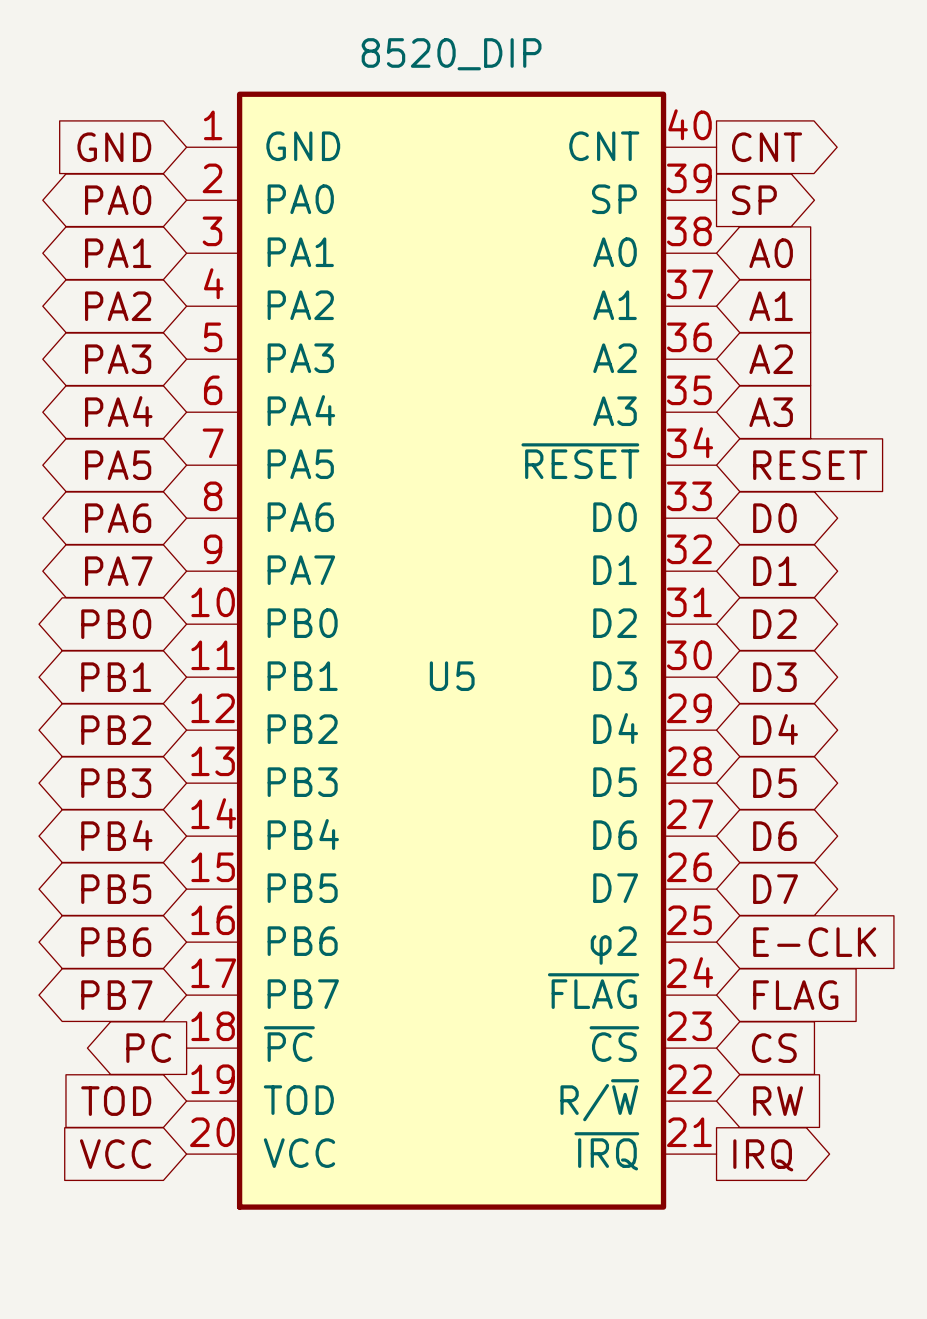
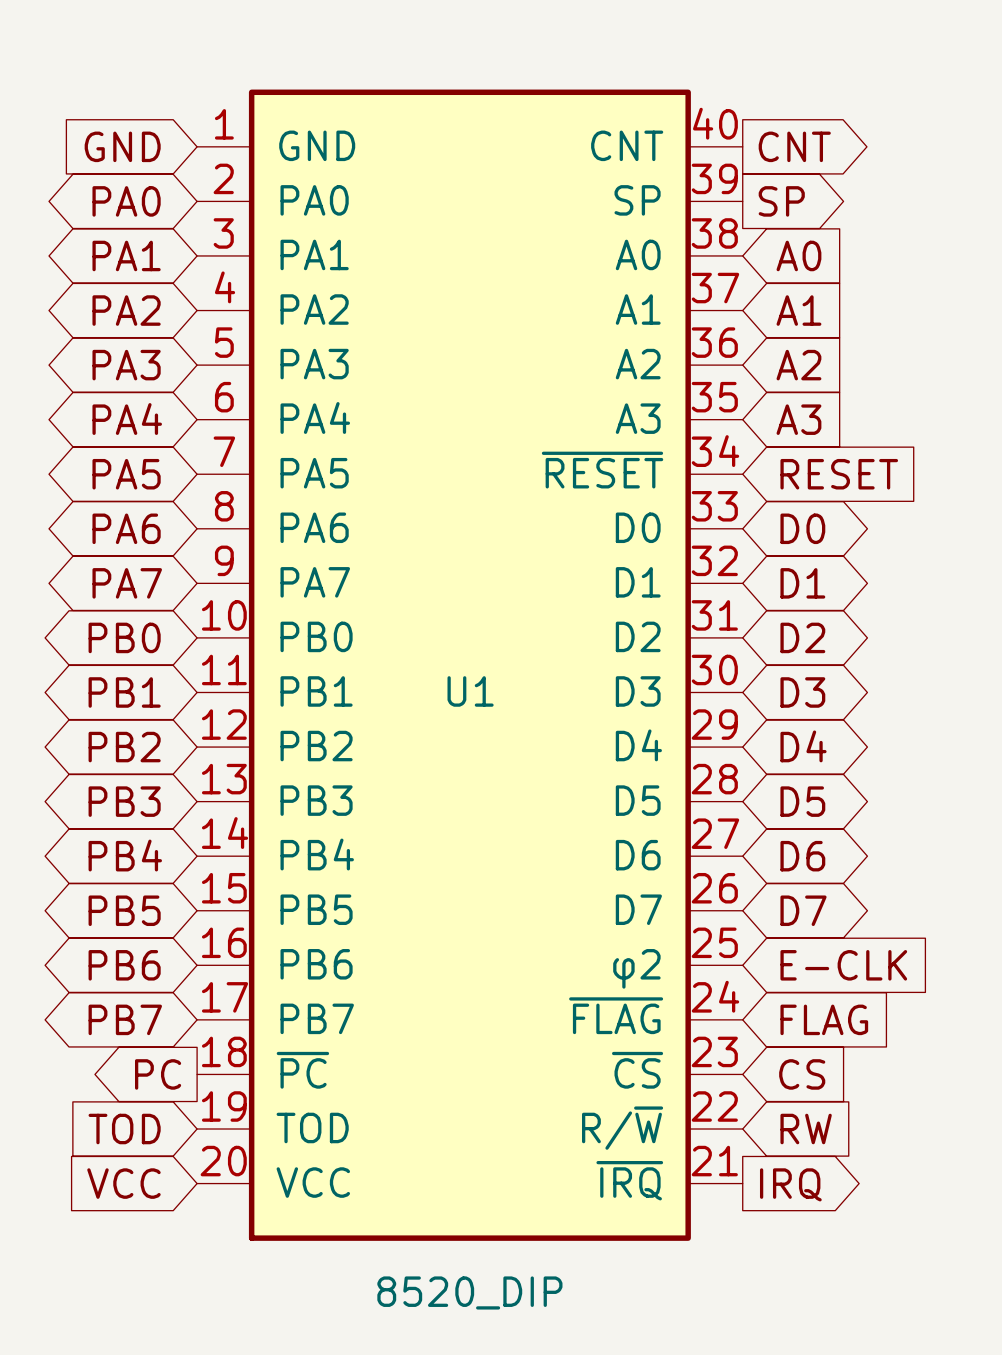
U5 value position: 8520_DIP (451, 54) -> 8520_DIP (469, 1292)
U5 name: U5 (452, 676) -> U1 (470, 691)

